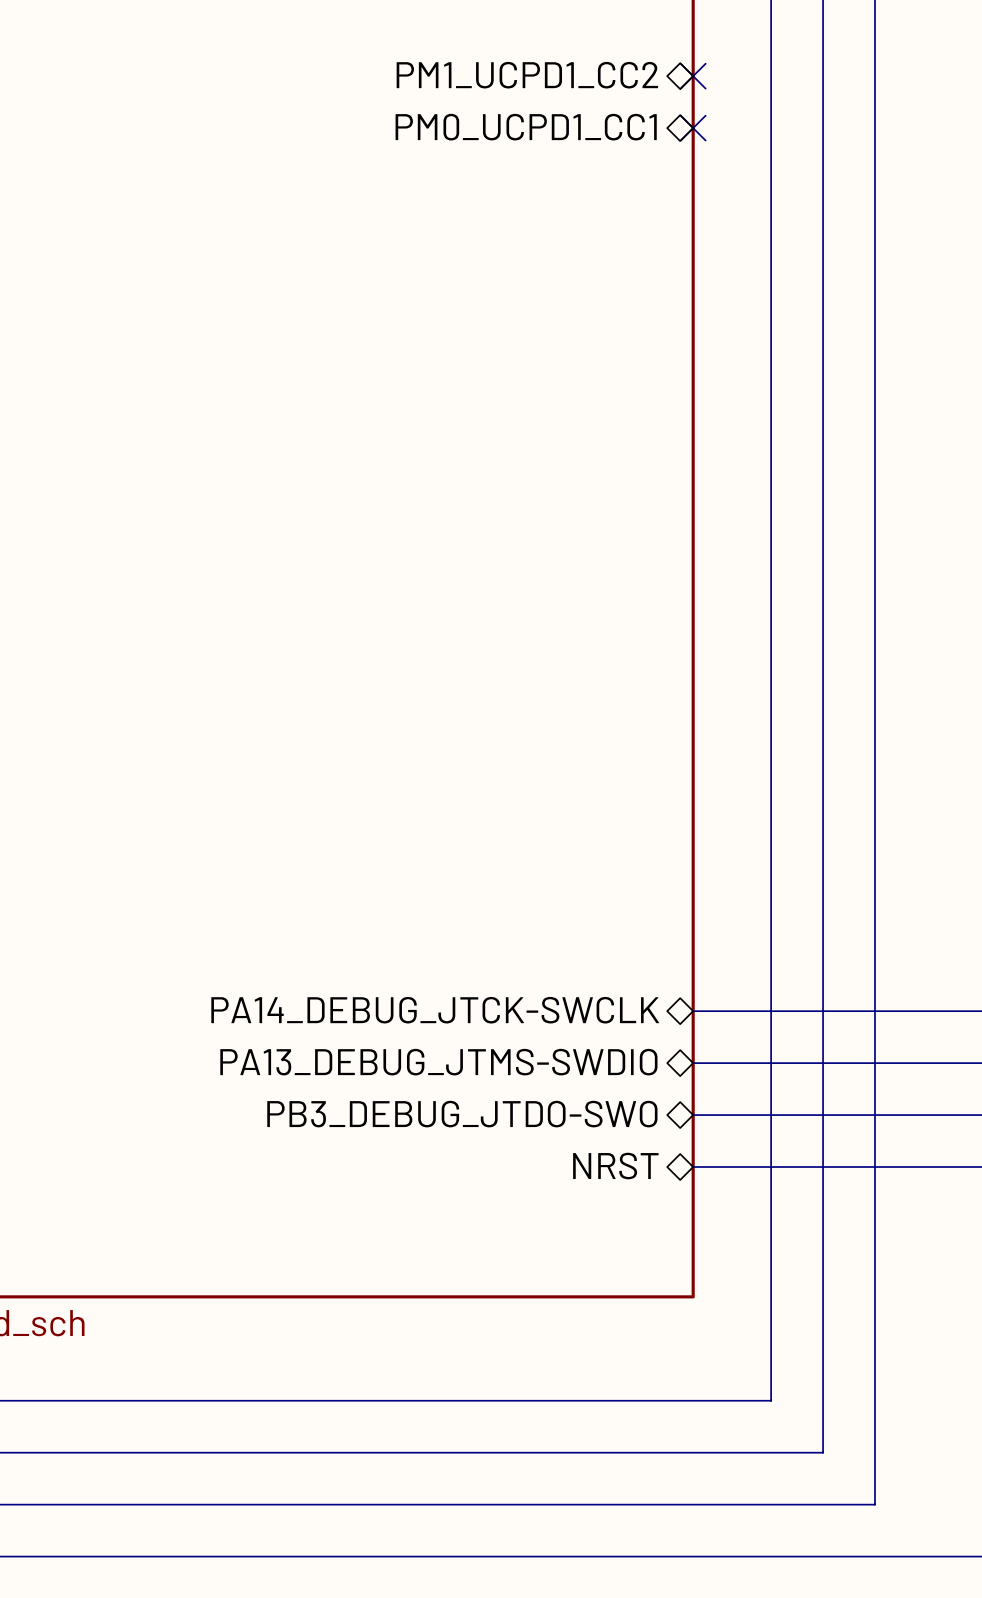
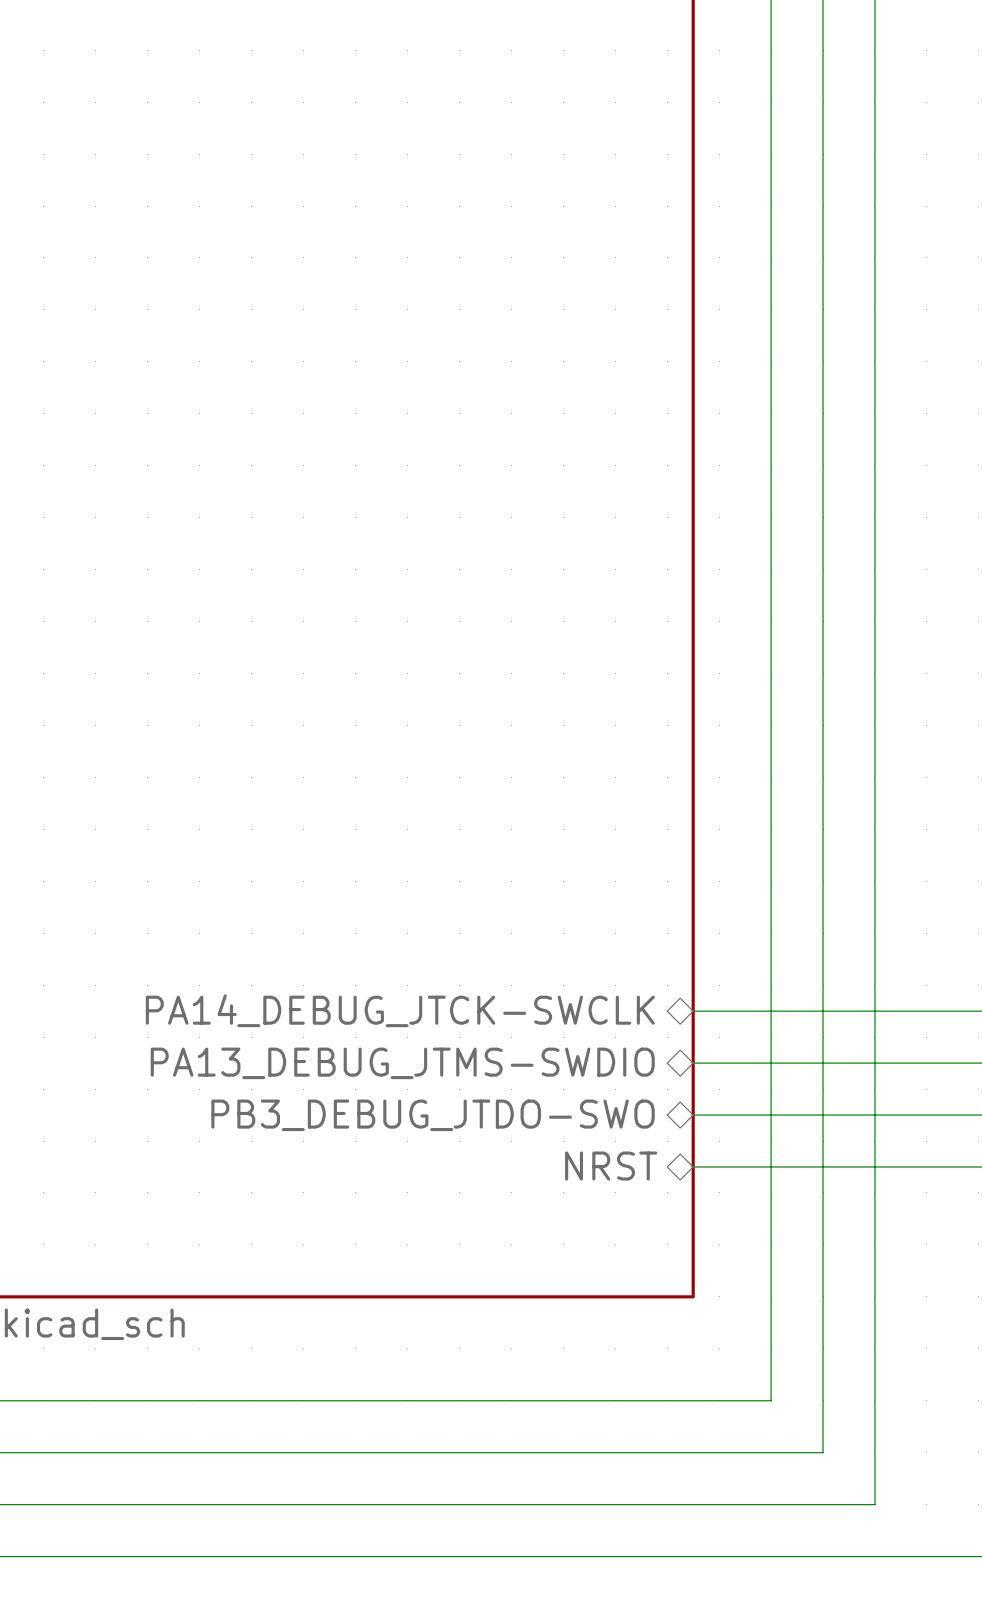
sheet pin: PM1_UCPD1_CC2 (527, 75) -> none
no-connect mark: (693, 76) -> none
sheet pin: PM0_UCPD1_CC1 (526, 127) -> none
no-connect mark: (693, 128) -> none

